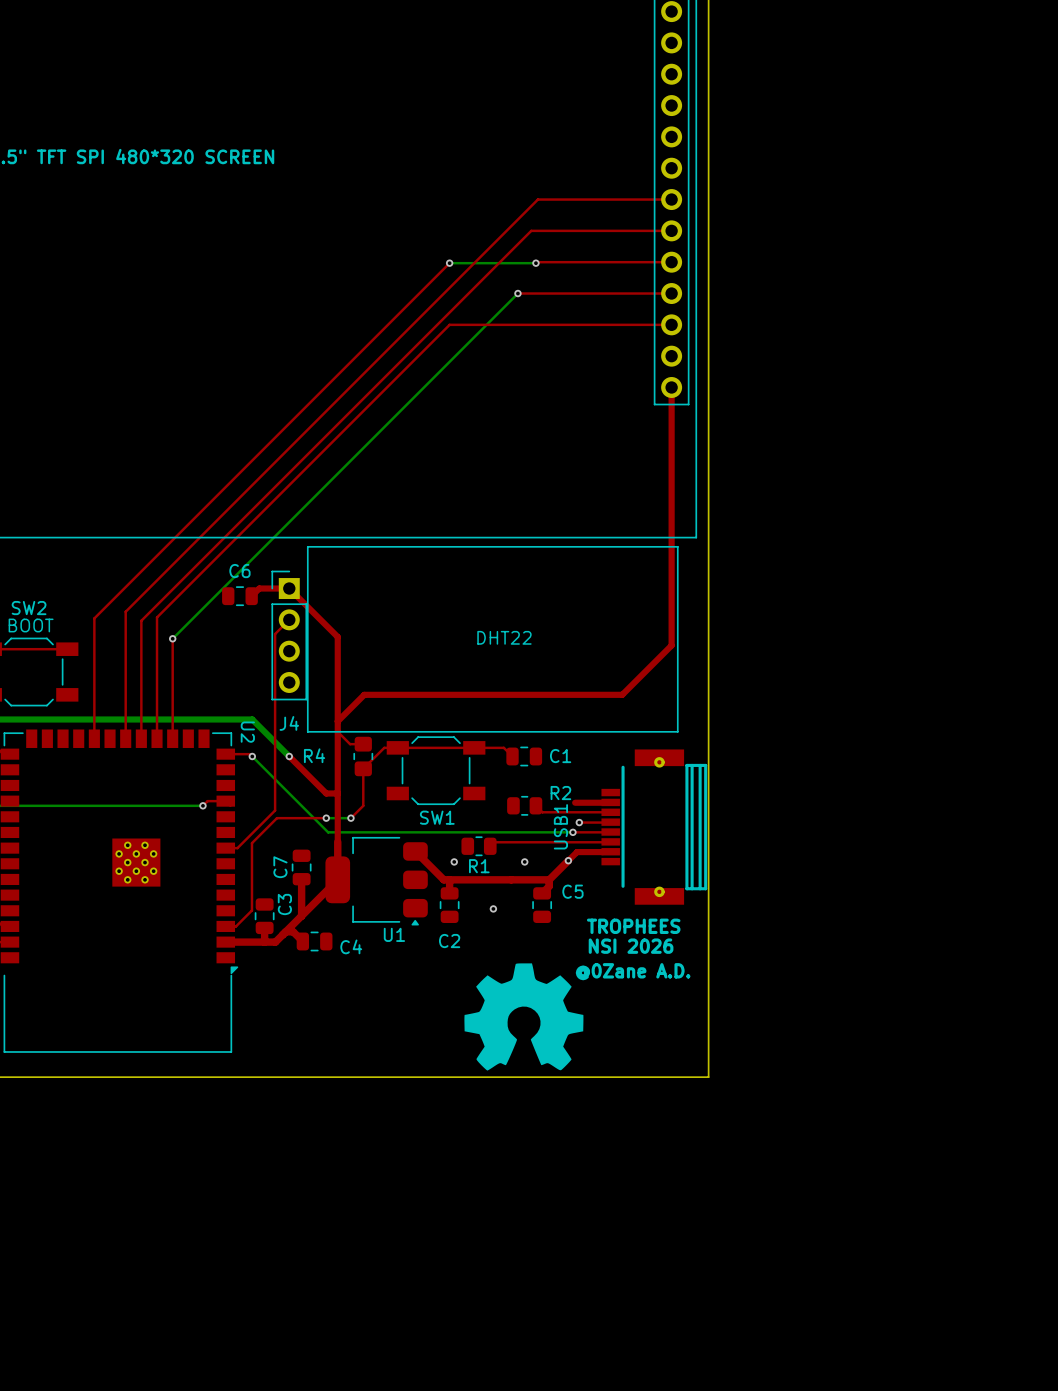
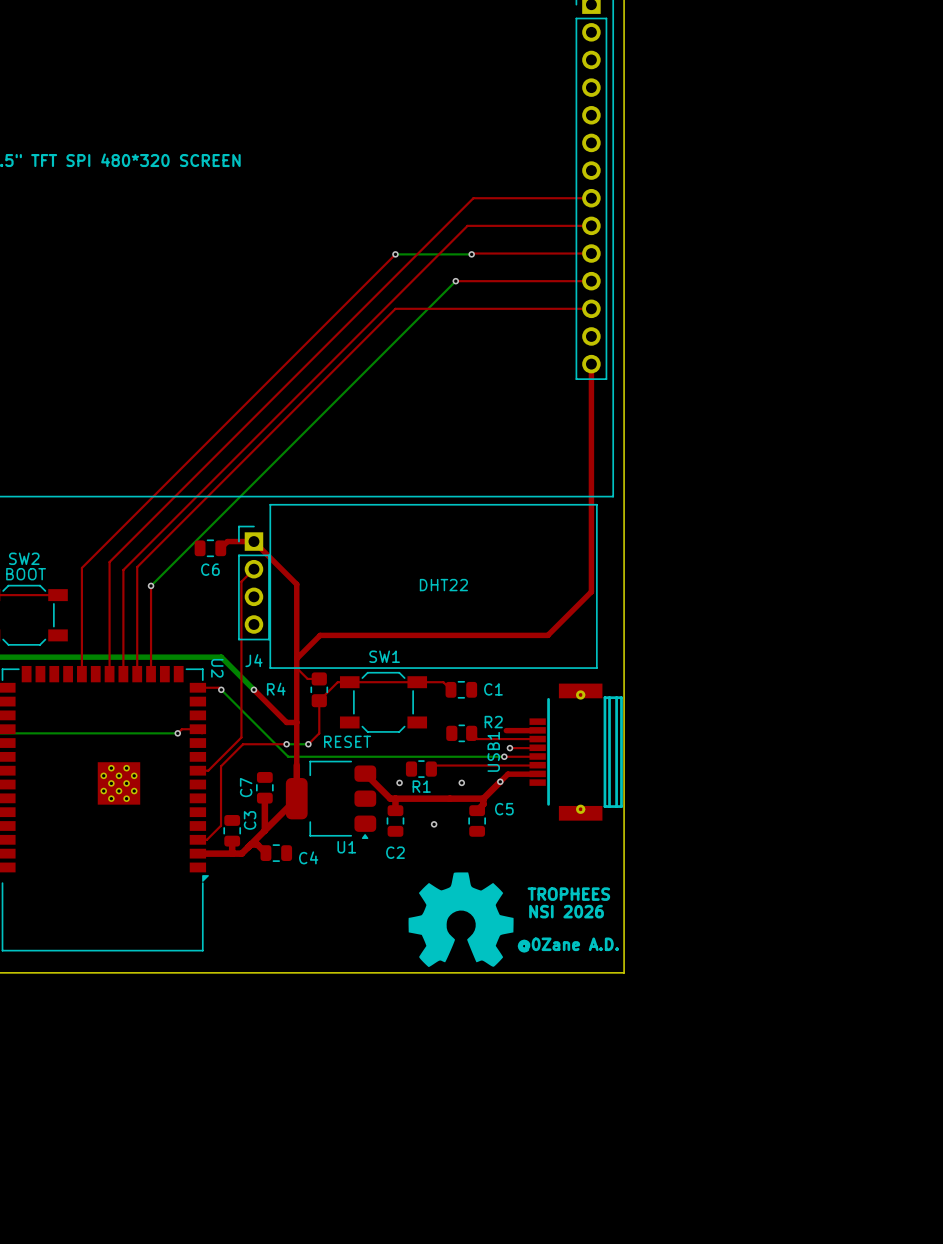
C6 name position: C6 (239, 571) -> C6 (210, 569)
text: none -> RESET (347, 741)
SW1 name position: SW1 (437, 817) -> SW1 (384, 656)
text position: TROPHEES (633, 926) -> TROPHEES (568, 894)
text position: NSI 2026 (631, 946) -> NSI 2026 (566, 911)
text position: @0Zane A.D. (633, 971) -> @0Zane A.D. (568, 945)

